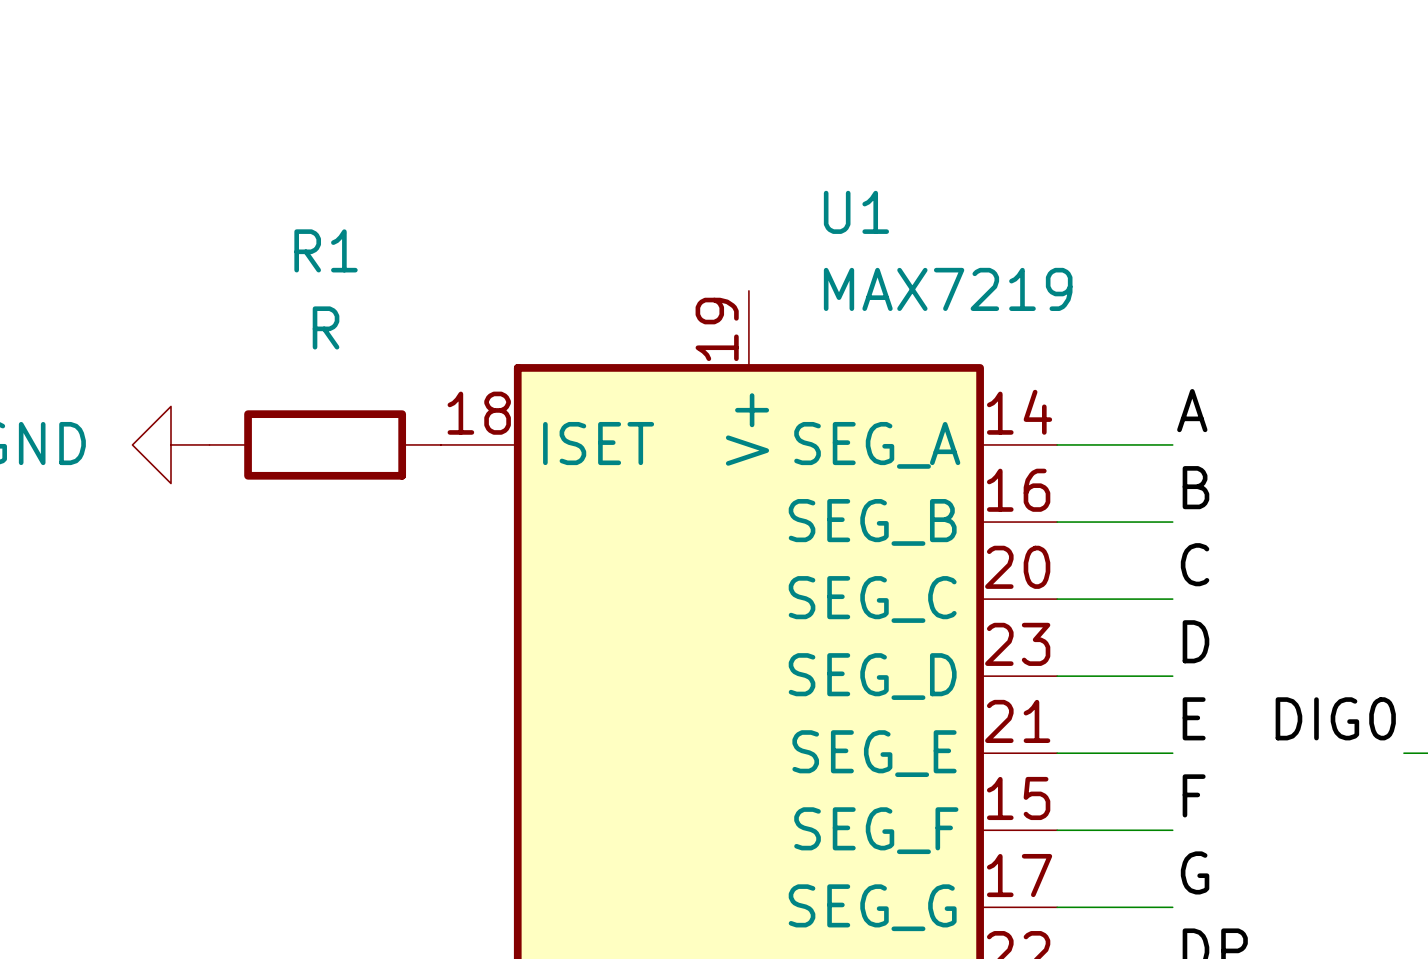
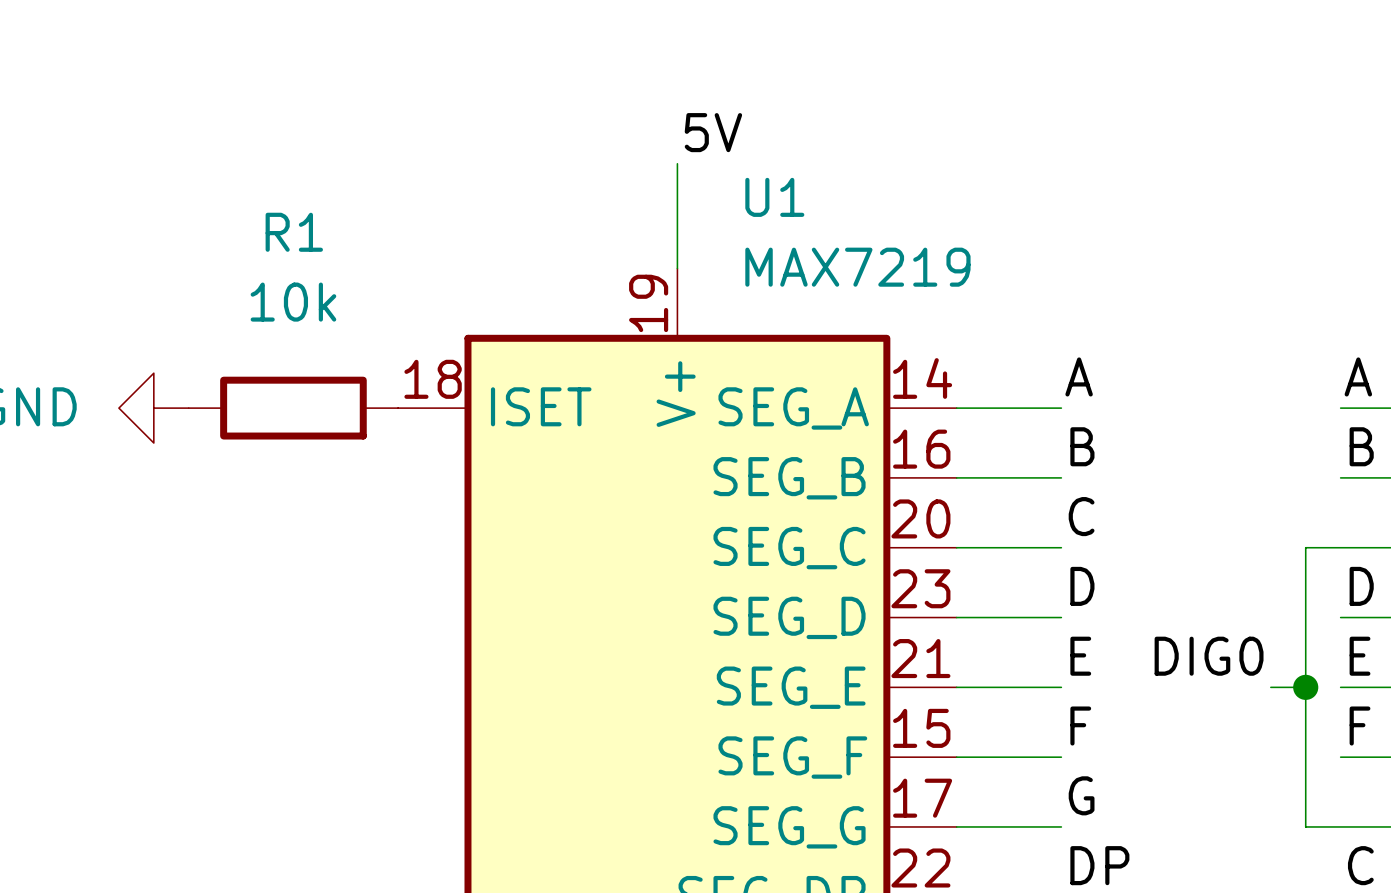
label: none -> 5V (713, 132)
wire: none -> (677, 163) (677, 268)
R1 value: R (326, 327) -> 10k (293, 302)

